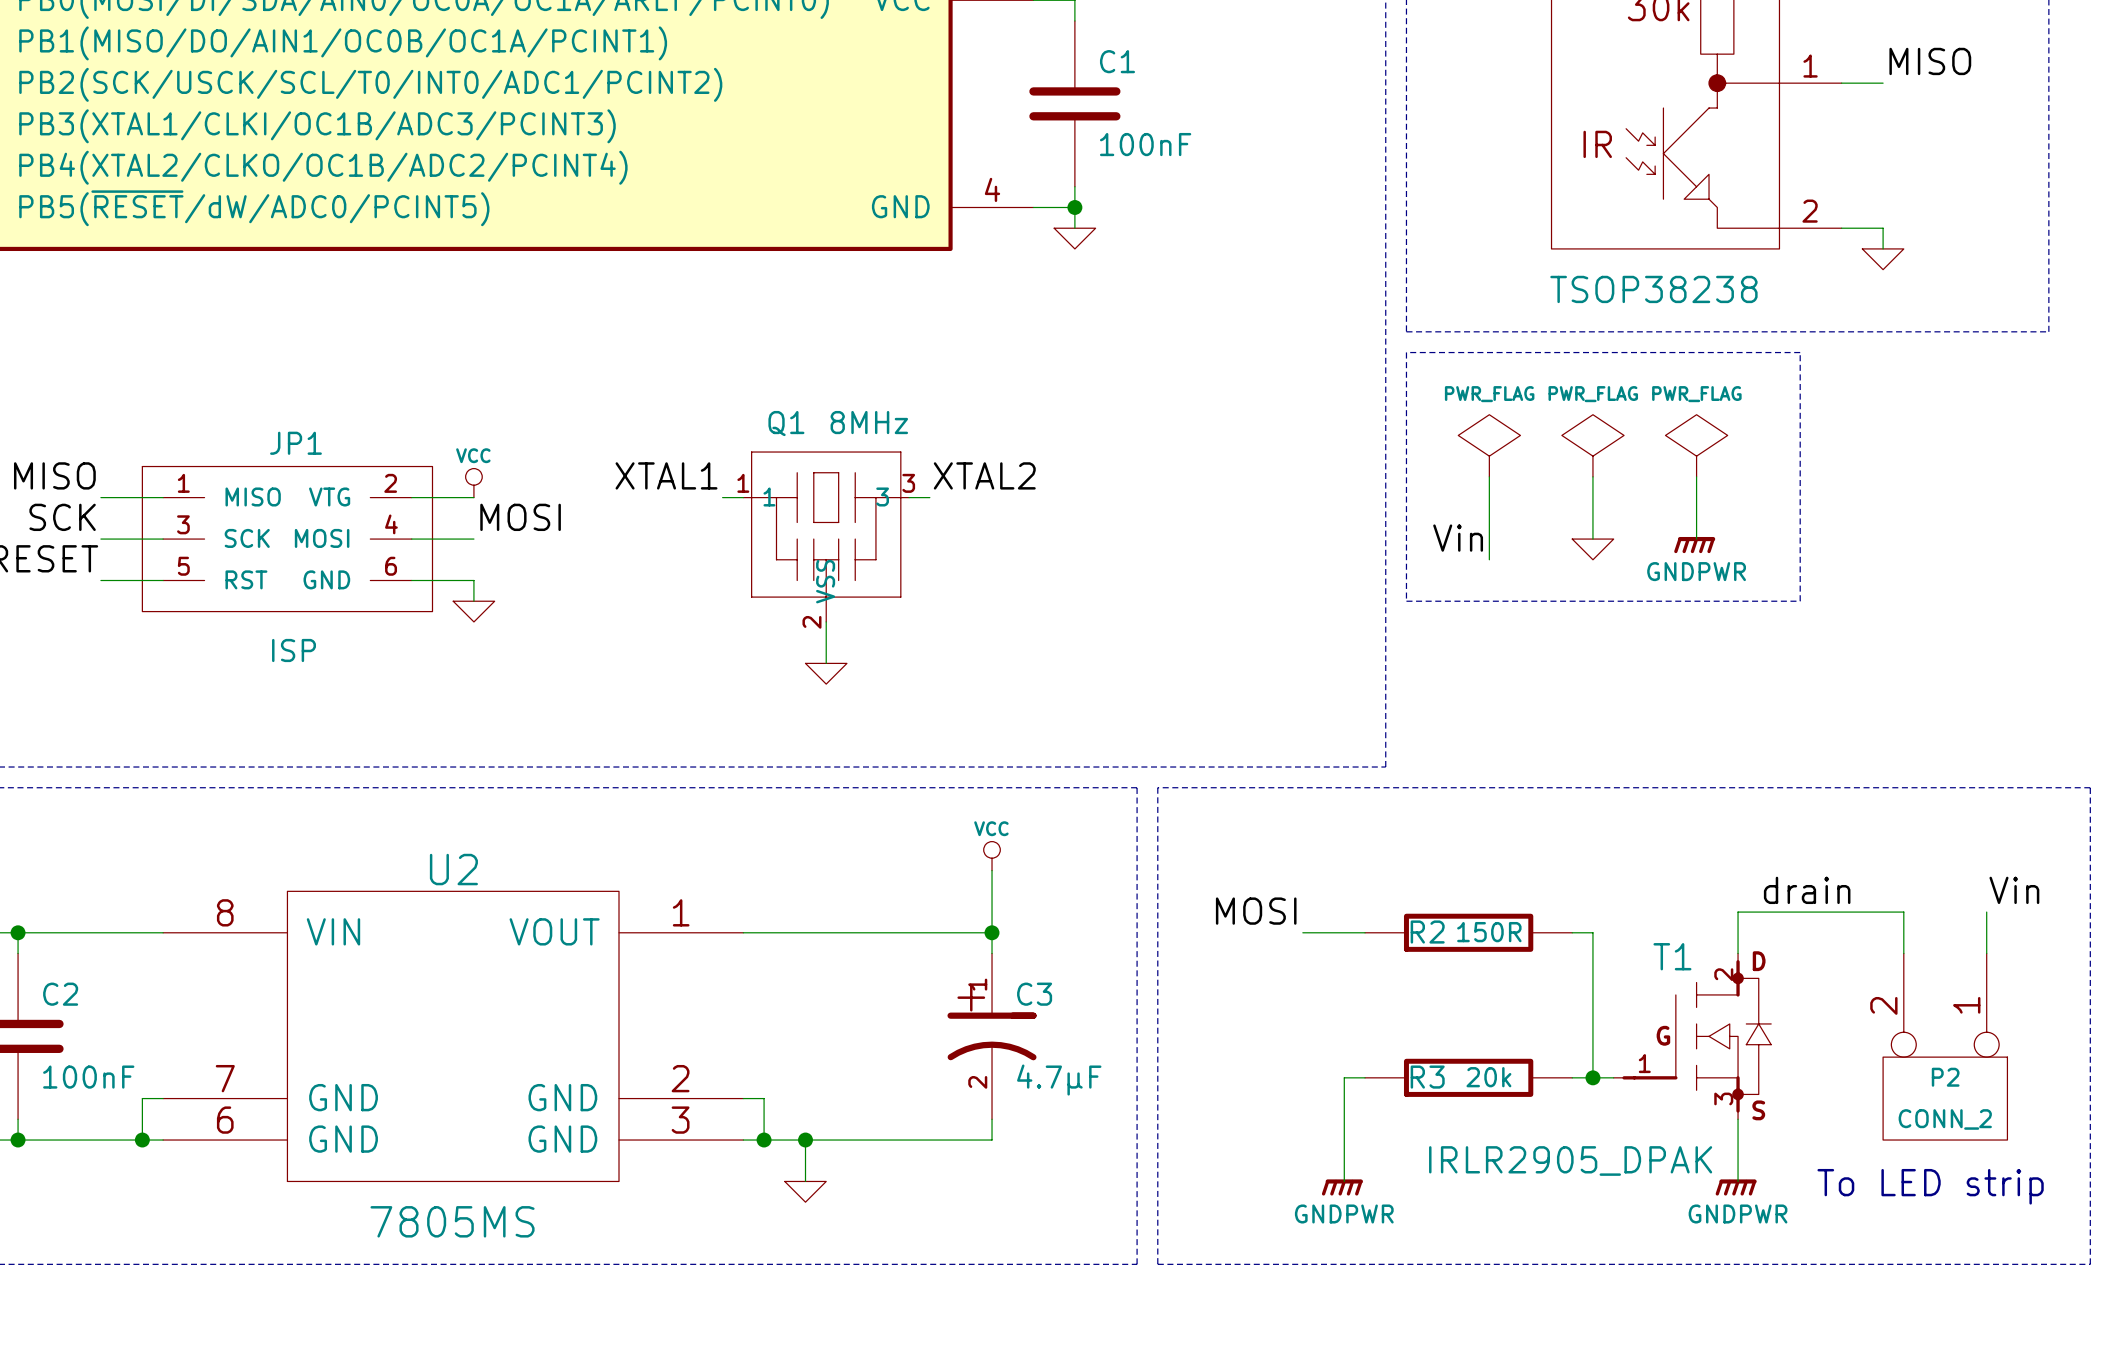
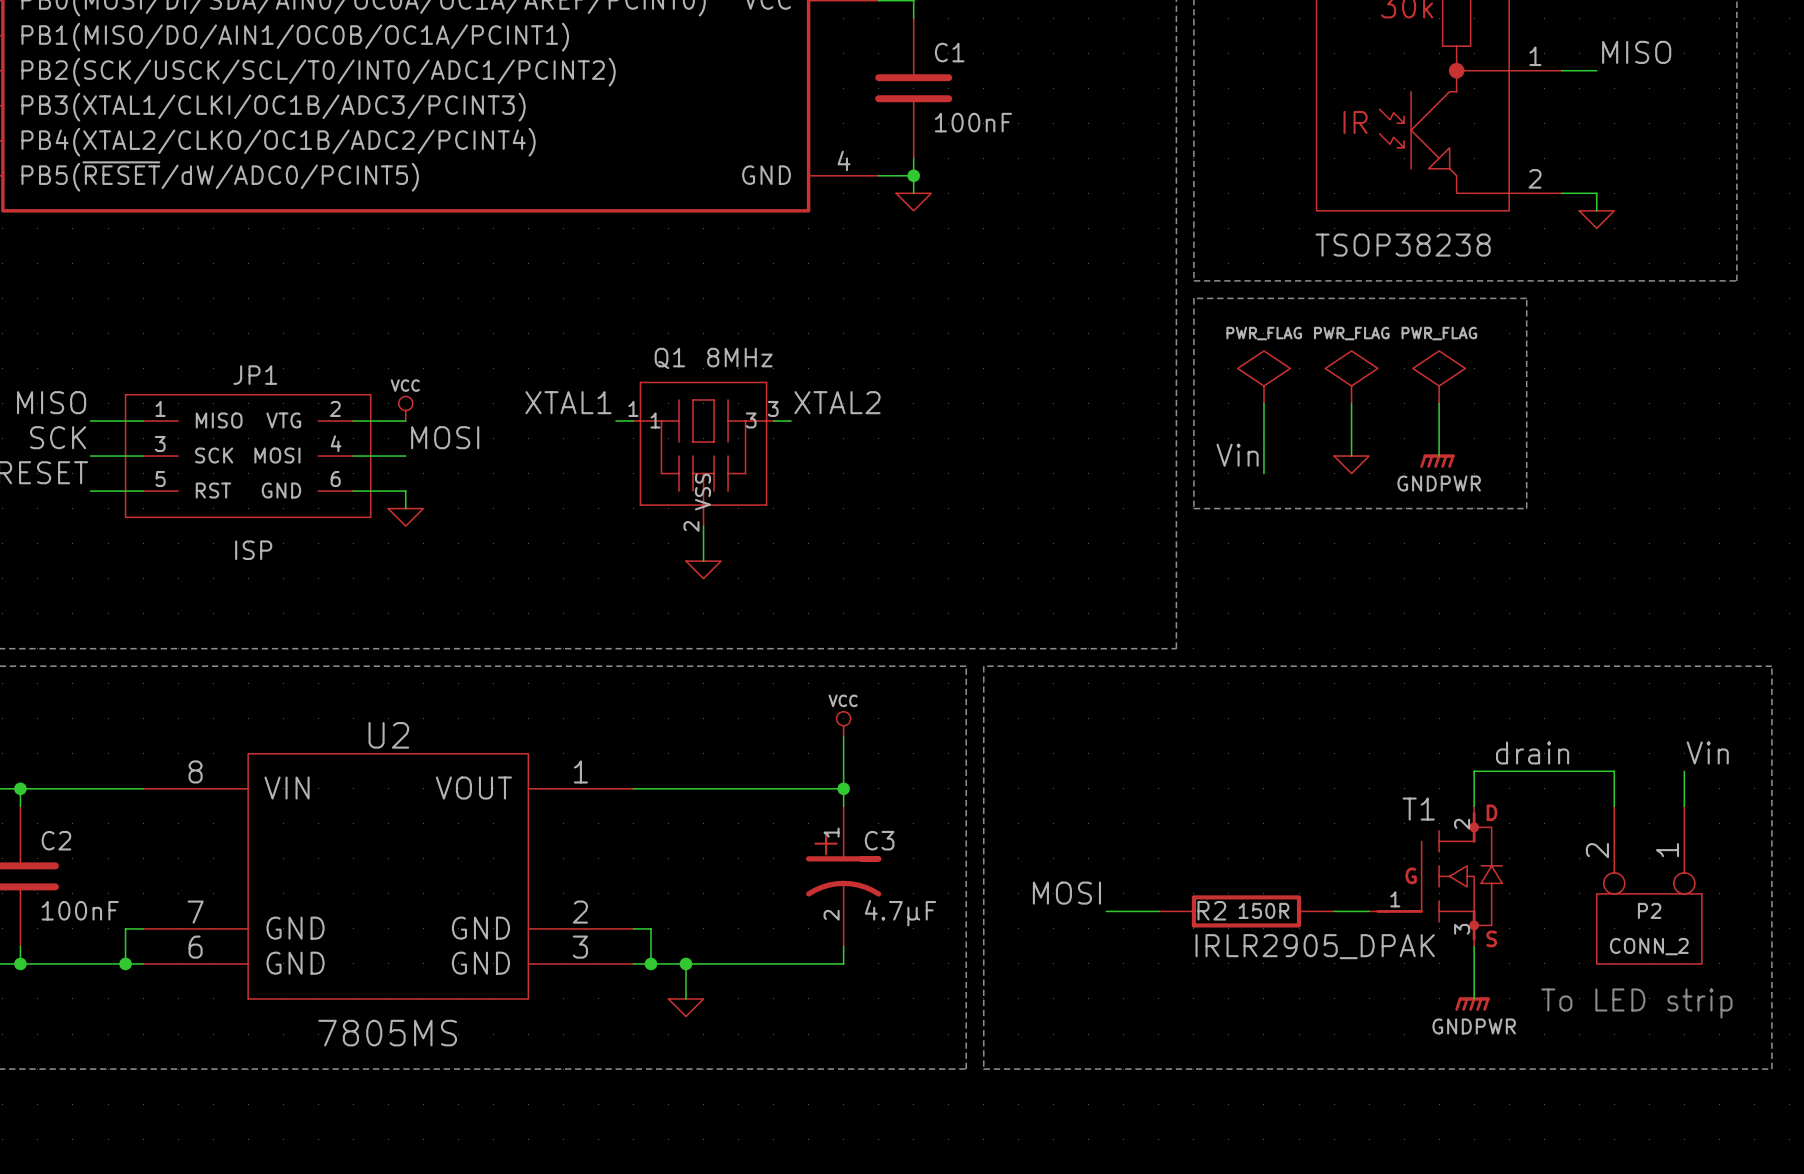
label position: MOSI (1256, 911) -> MOSI (1066, 893)
wire: (1302, 932) (1365, 932) -> none
R2: 150R (1468, 932) -> none
wire: (1572, 932) (1592, 932) (1592, 1077) -> none
wire: (1344, 1077) (1344, 1181) -> (1141, 911) (1106, 911)
R3 name: R3 (1427, 1077) -> R2 (1211, 910)
R3 value: 20k (1488, 1077) -> 150R (1263, 910)
junction: (1592, 1077) -> none
T1 value position: IRLR2905_DPAK (1570, 1160) -> IRLR2905_DPAK (1315, 946)
power symbol: GNDPWR (1342, 1187) -> none

